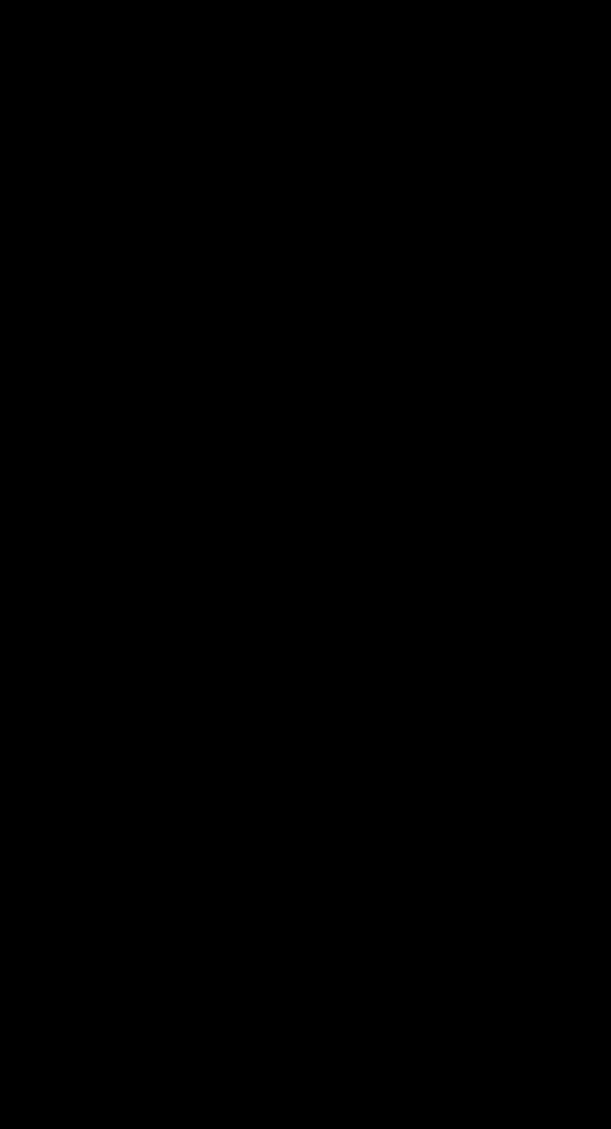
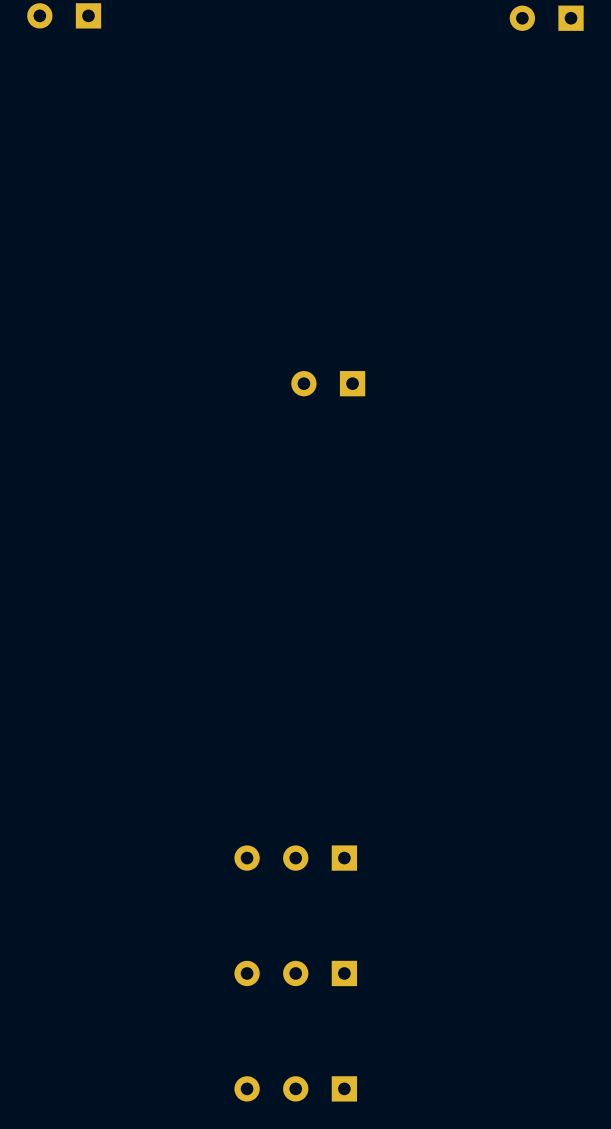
part: none -> (64, 15)
part: none -> (546, 18)
part: none -> (328, 383)
part: none -> (295, 858)
part: none -> (295, 973)
part: none -> (295, 1088)

